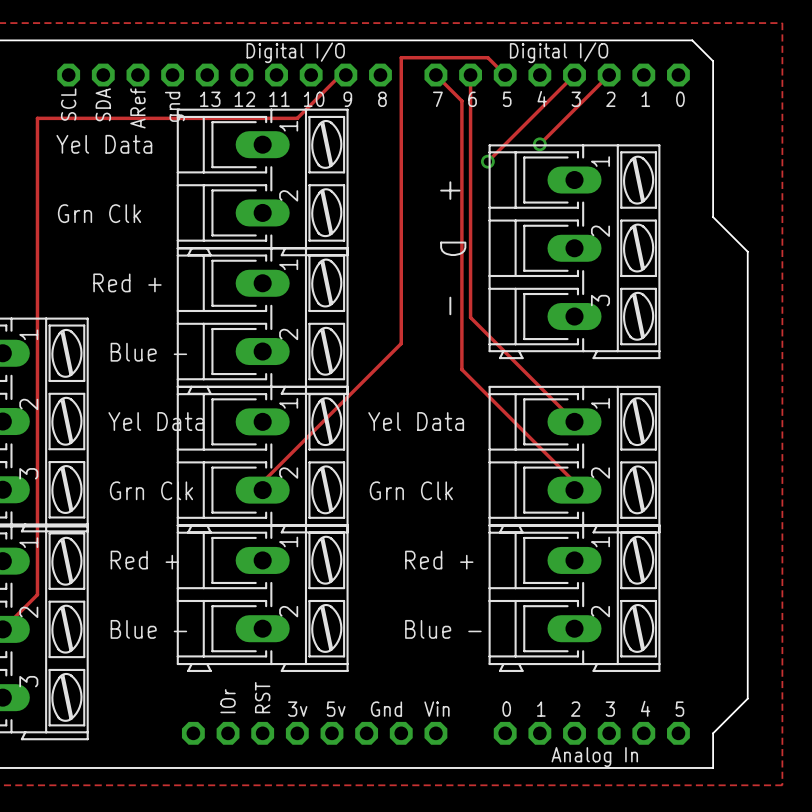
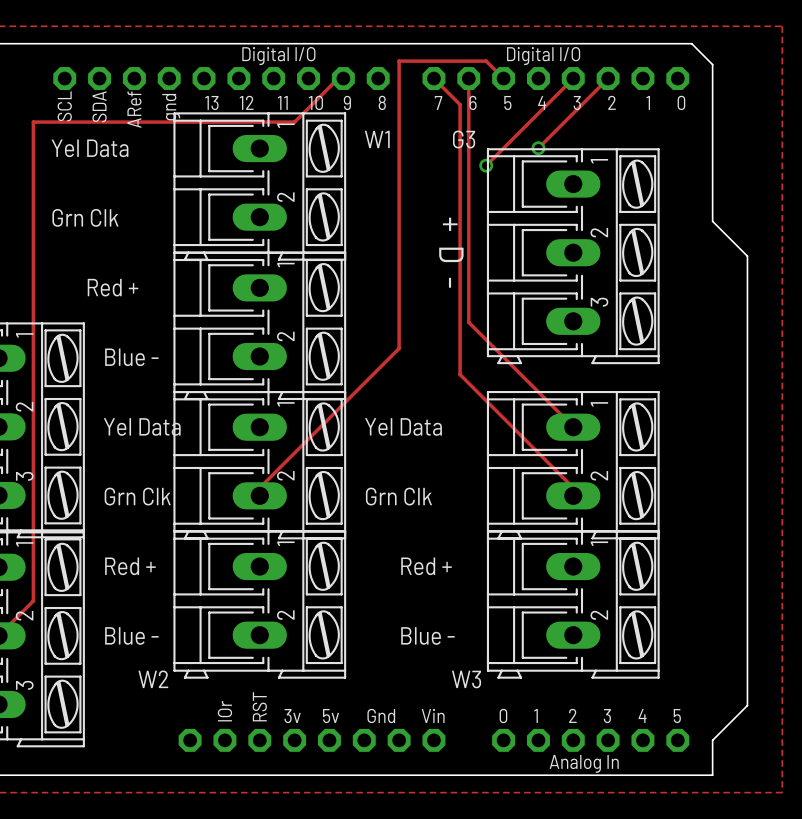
text: none -> W1 (377, 139)
text: none -> G3 (464, 139)
text: none -> W2 (153, 679)
text: none -> W3 (466, 679)

